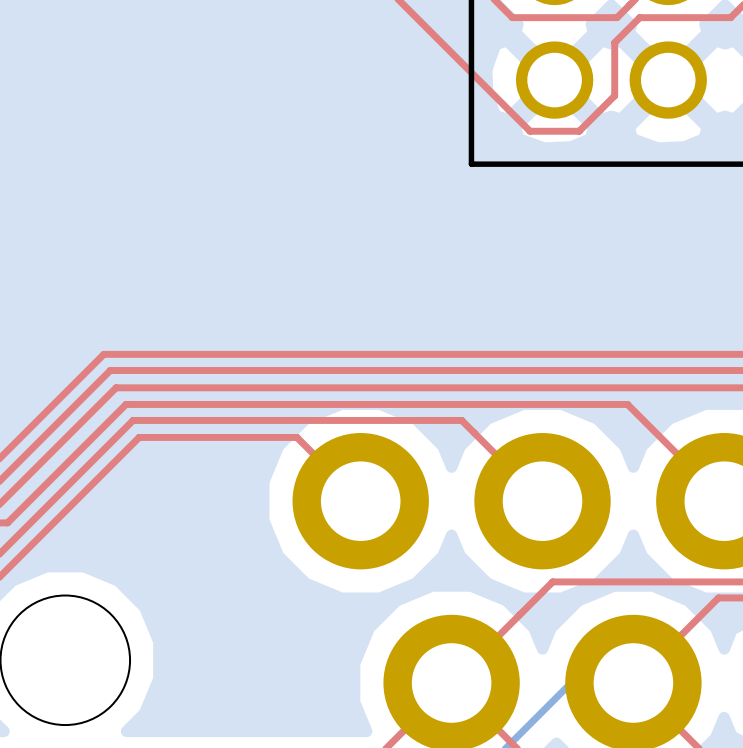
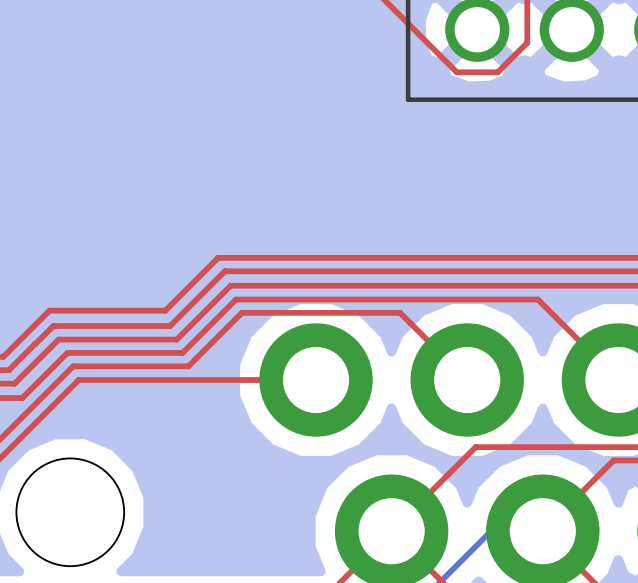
top track: (243, 354) (103, 354) (40, 417) -> (218, 257) (165, 310) (49, 310)
top track: (251, 370) (110, 370) (22, 458) -> (169, 326) (53, 326) (35, 344)
top track: none -> (224, 271) (169, 326)
top track: (258, 387) (116, 387) (51, 452) -> (230, 285) (176, 339) (58, 339)
top track: (264, 404) (126, 404) (61, 468) -> (236, 299) (182, 353) (67, 352)
top track: (271, 420) (133, 420) (68, 484) -> (241, 312) (188, 366) (73, 366)
top track: (75, 501) (139, 437) (296, 437) (360, 501) -> (78, 379) (316, 379)

